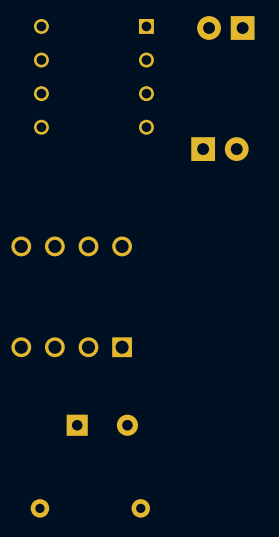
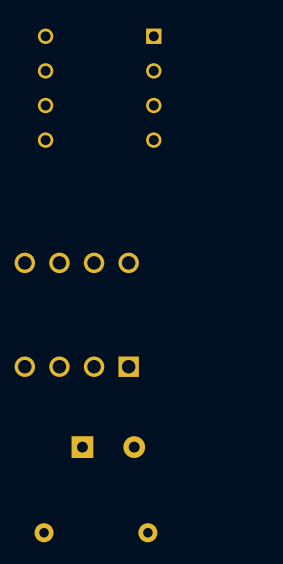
part: (225, 27) -> none
part: (219, 149) -> none

